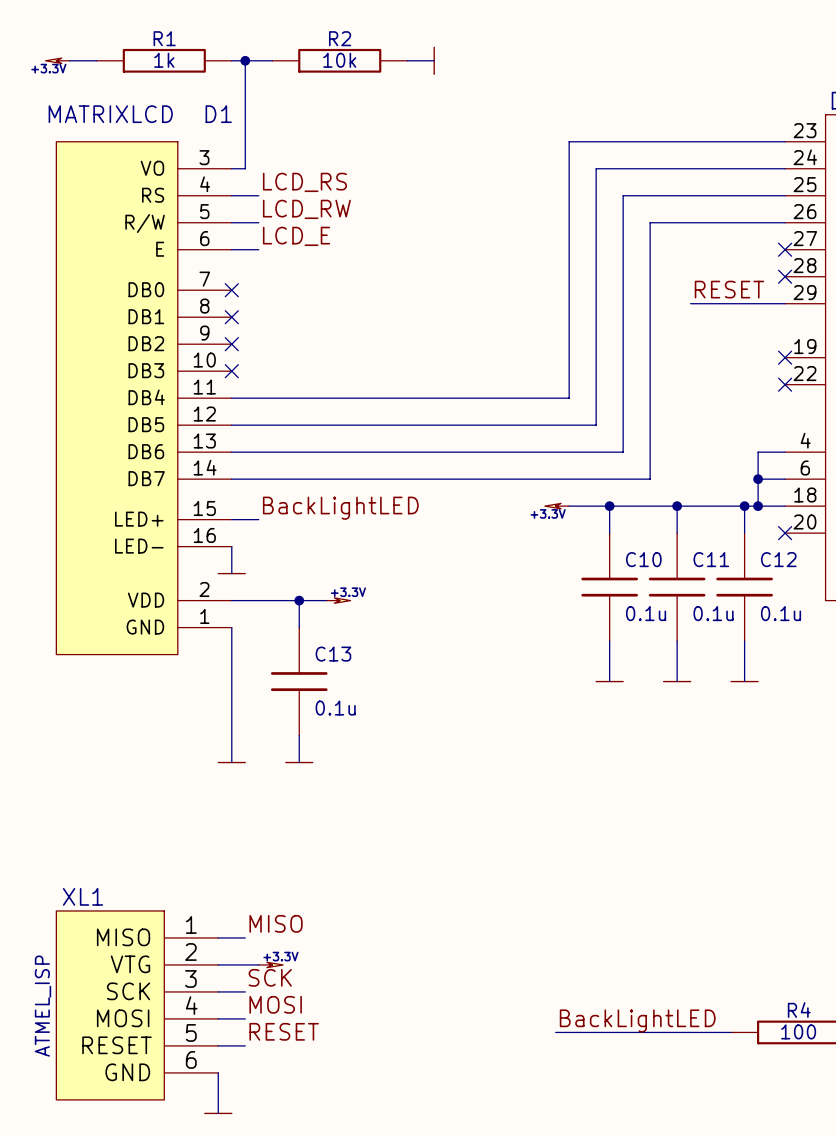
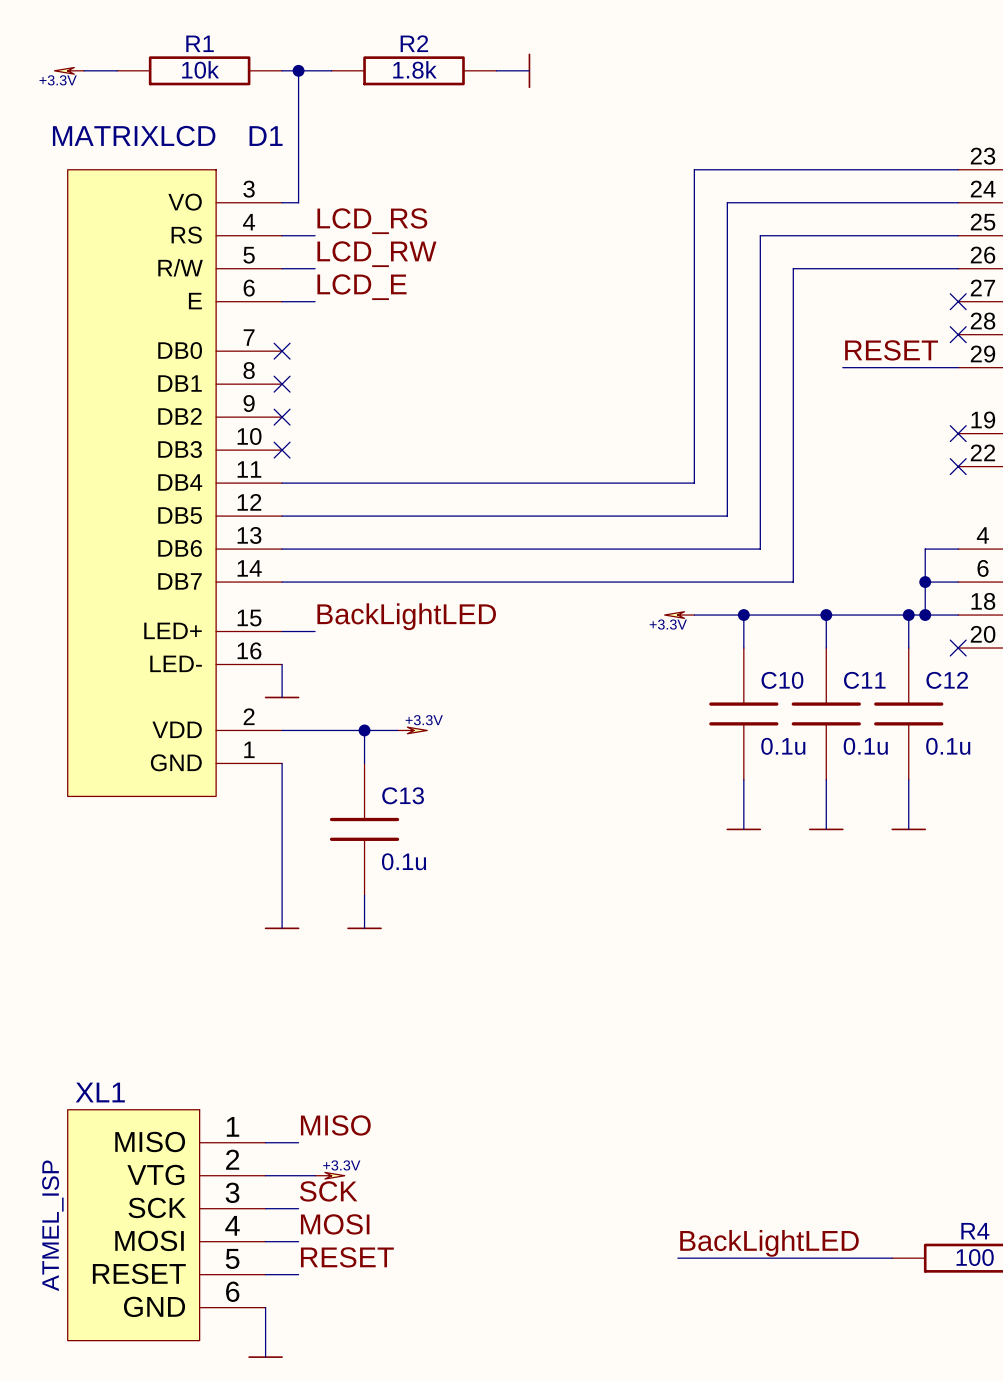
R1 value: 1k (164, 60) -> 10k (200, 69)
R2 value: 10k (339, 60) -> 1.8k (414, 69)

